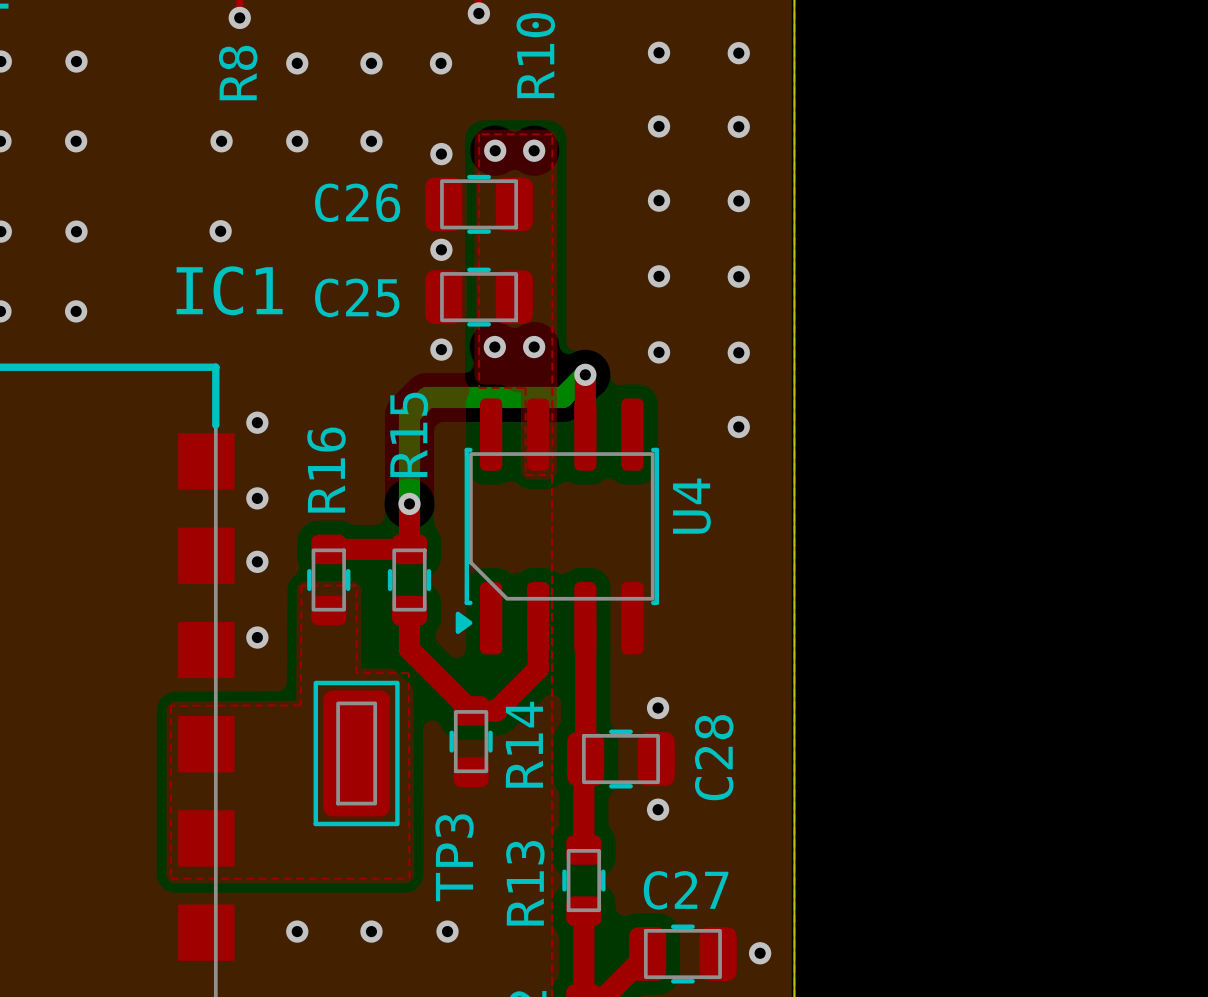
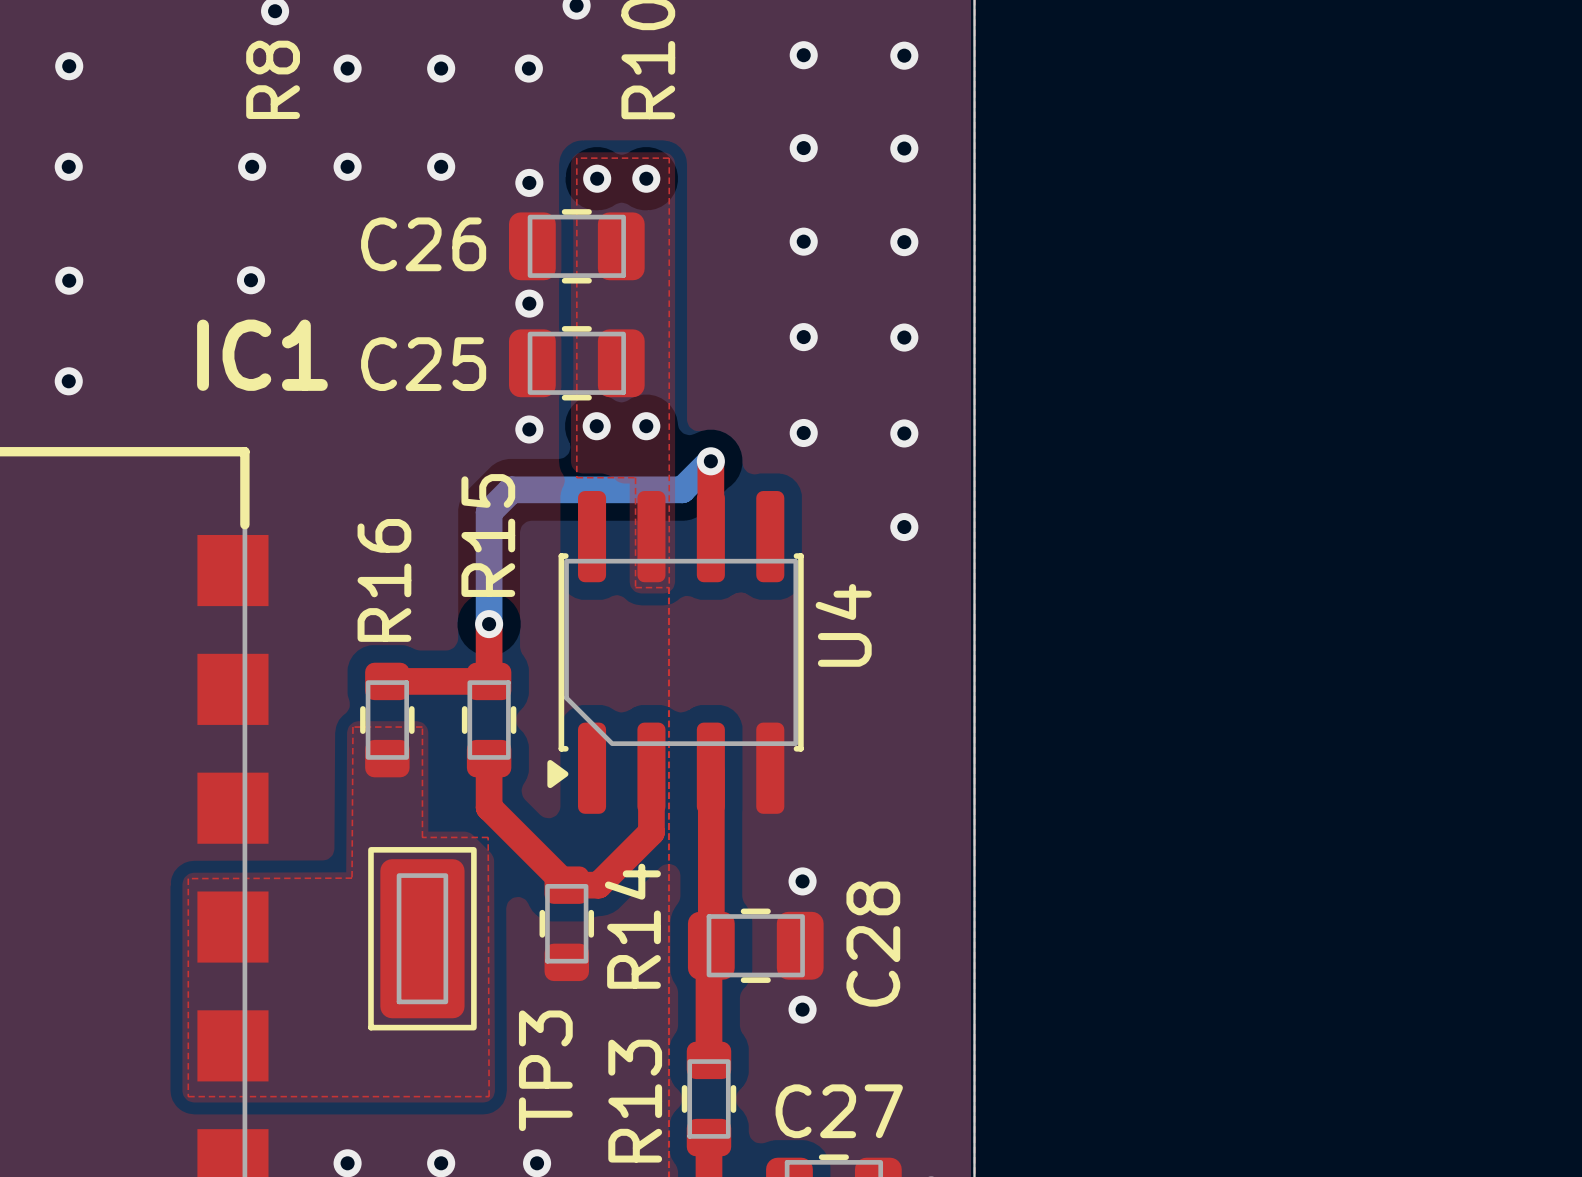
via: (257, 422) -> none
via: (257, 498) -> none
via: (257, 561) -> none
via: (257, 637) -> none

